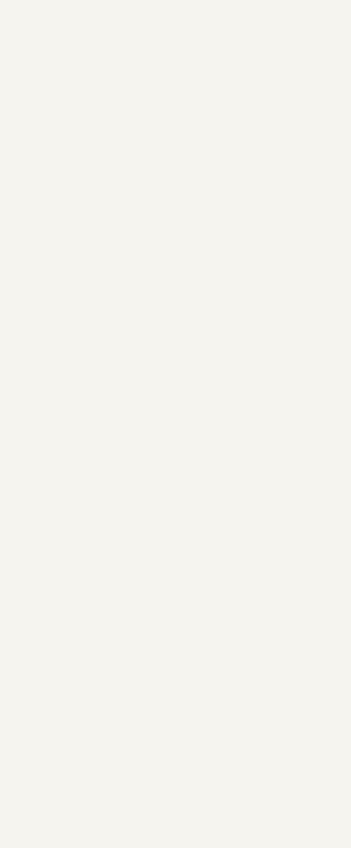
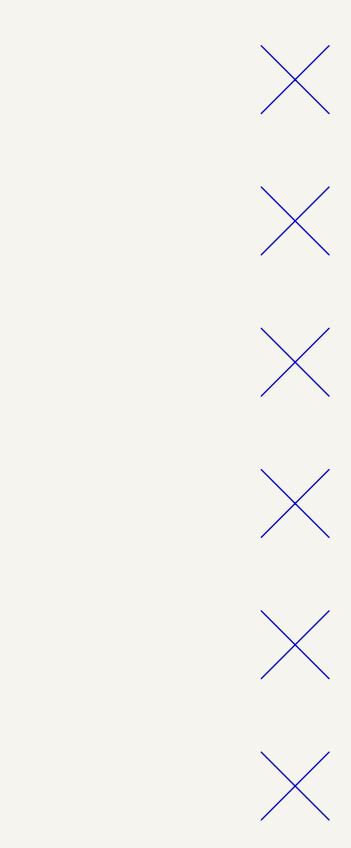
no-connect mark: none -> (295, 79)
no-connect mark: none -> (295, 220)
no-connect mark: none -> (295, 362)
no-connect mark: none -> (295, 503)
no-connect mark: none -> (295, 644)
no-connect mark: none -> (295, 786)

